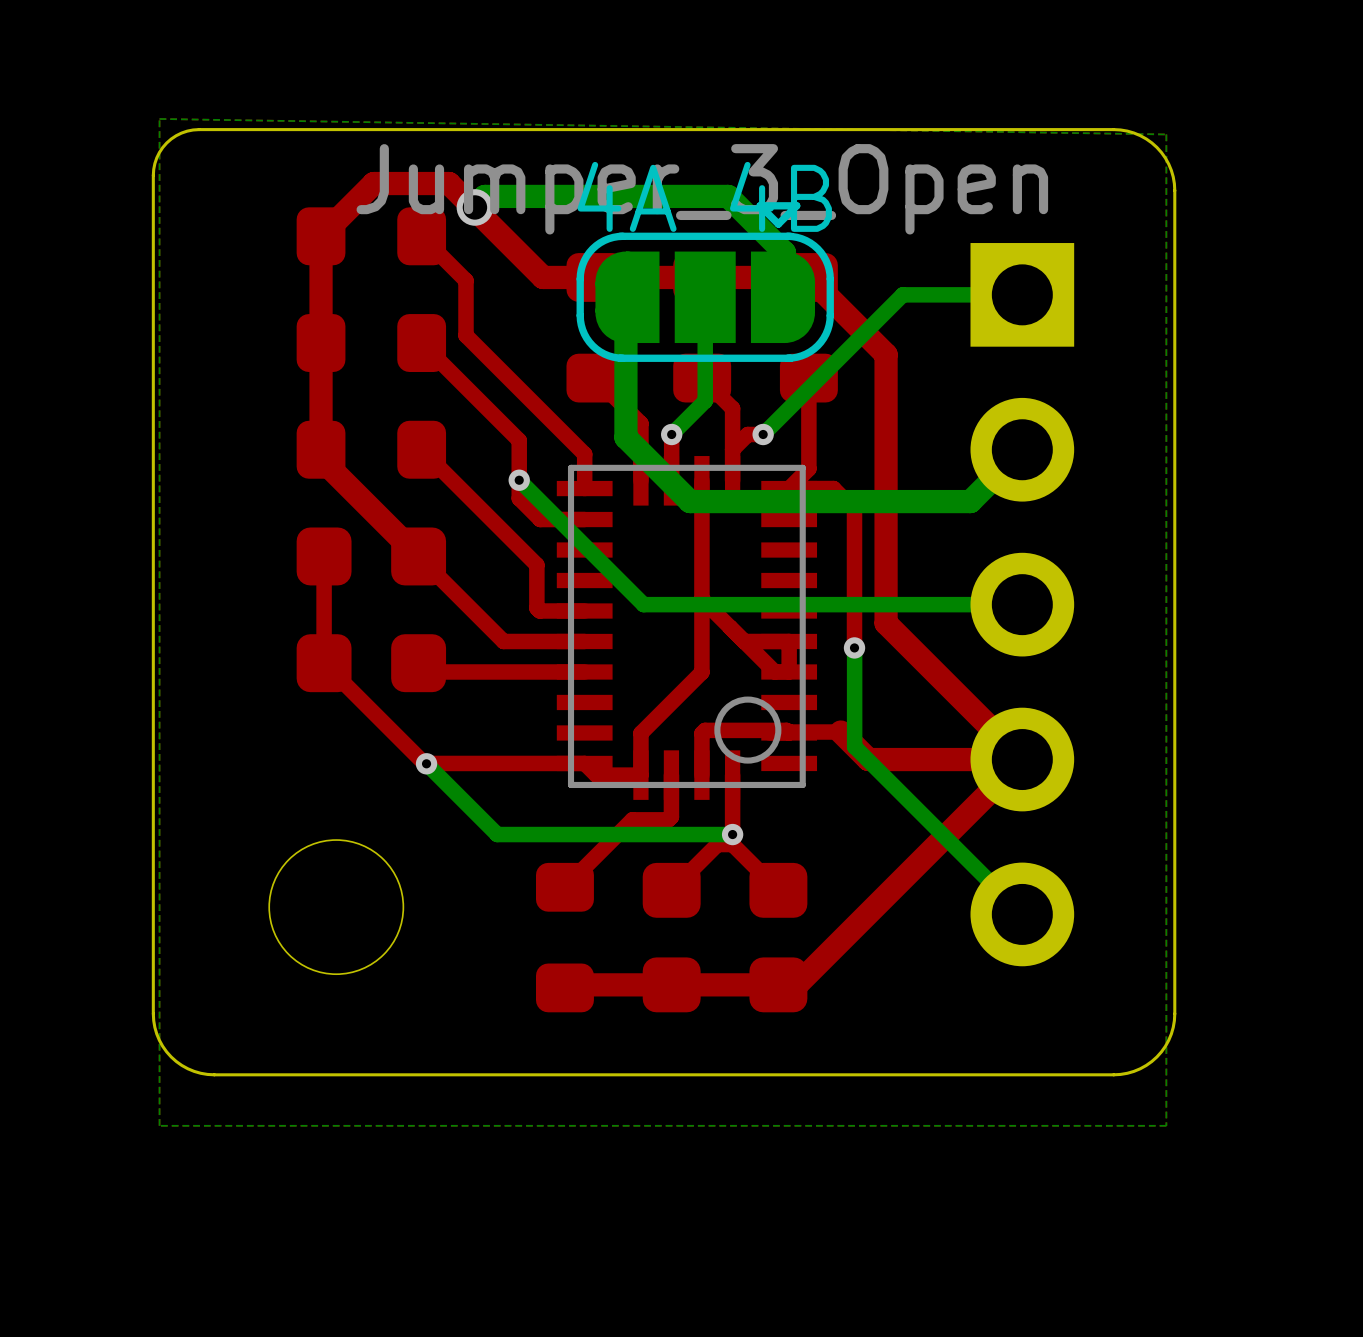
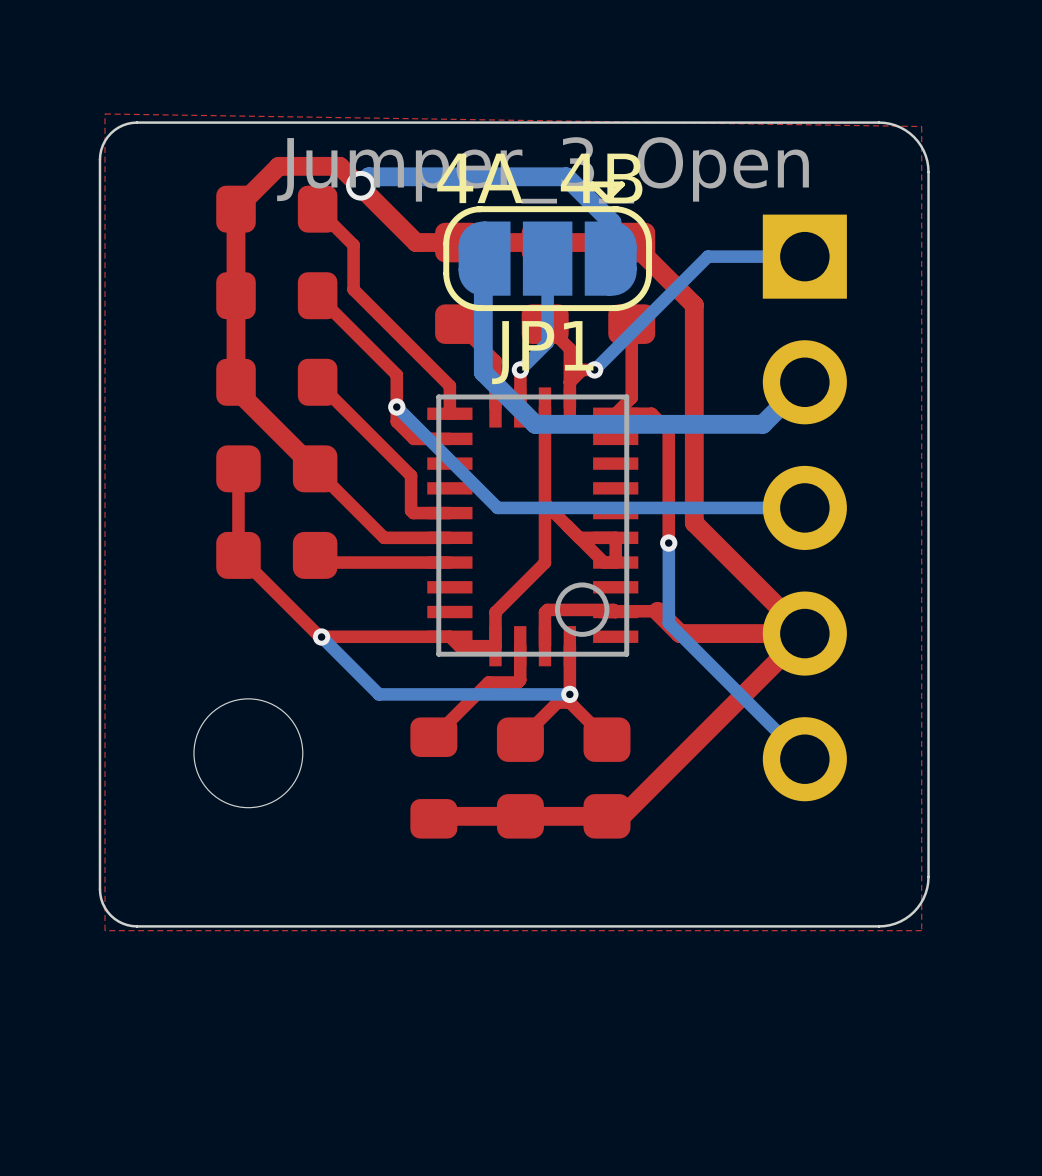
bottom zone outline: (159, 118) (159, 1125) (1166, 1125) (1166, 134) (159, 118) -> none
JP1 name: none -> JP1 (542, 352)
board edge: (1174, 1013) (1171, 1033) (1165, 1046) (1156, 1056) (1140, 1068) (1127, 1073) (1113, 1074) (207, 1074) (187, 1068) (171, 1056) (159, 1040) (154, 1027) (153, 1013) -> (928, 839) (928, 882) (920, 903) (914, 911) (900, 921) (879, 926) (132, 926) (114, 918) (102, 903) (99, 889) (99, 839)

